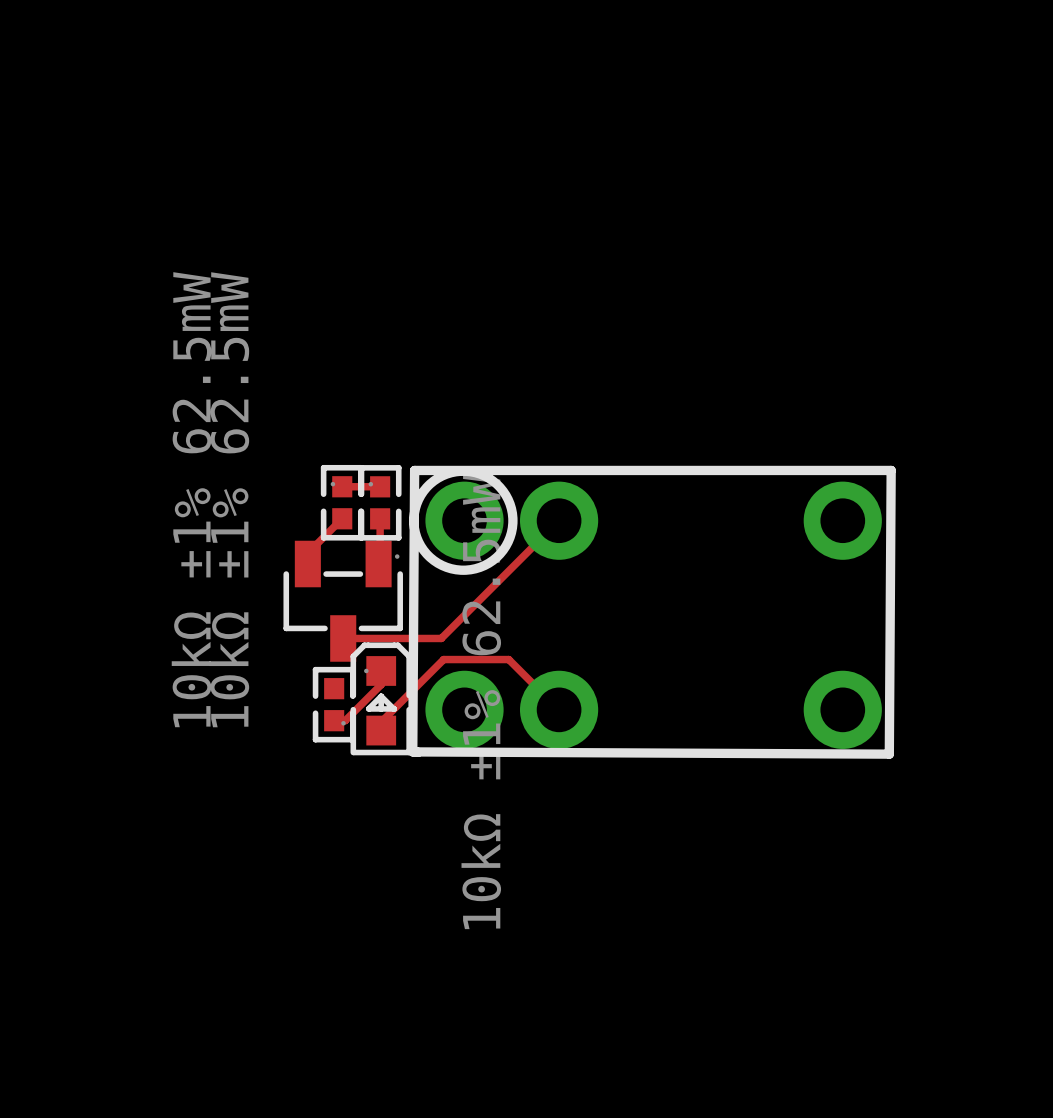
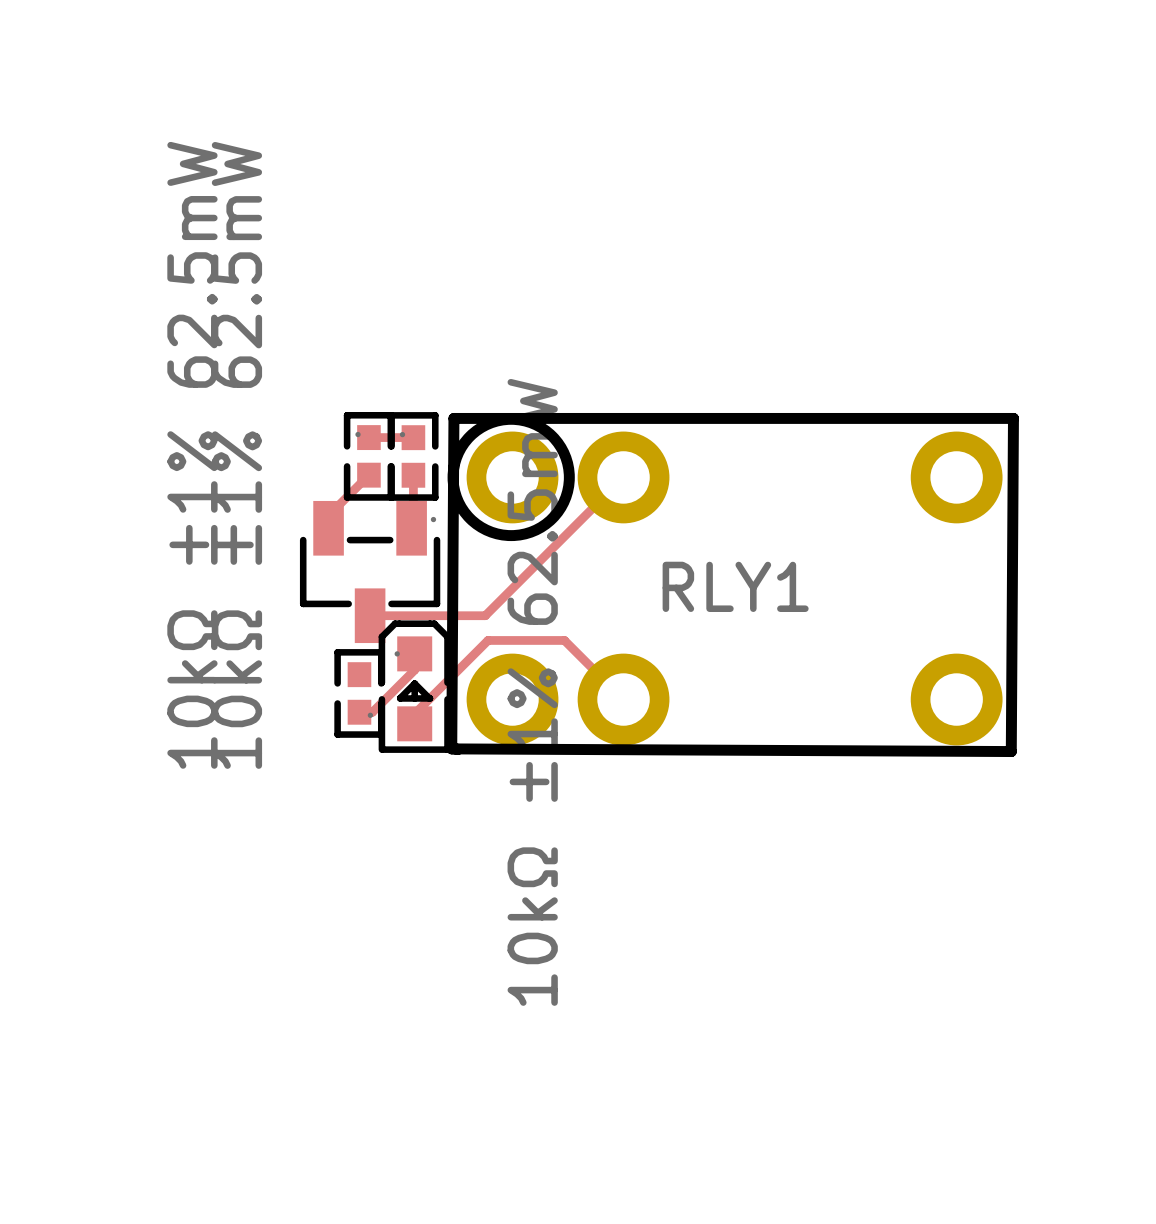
RLY1 name: none -> RLY1 (735, 586)

